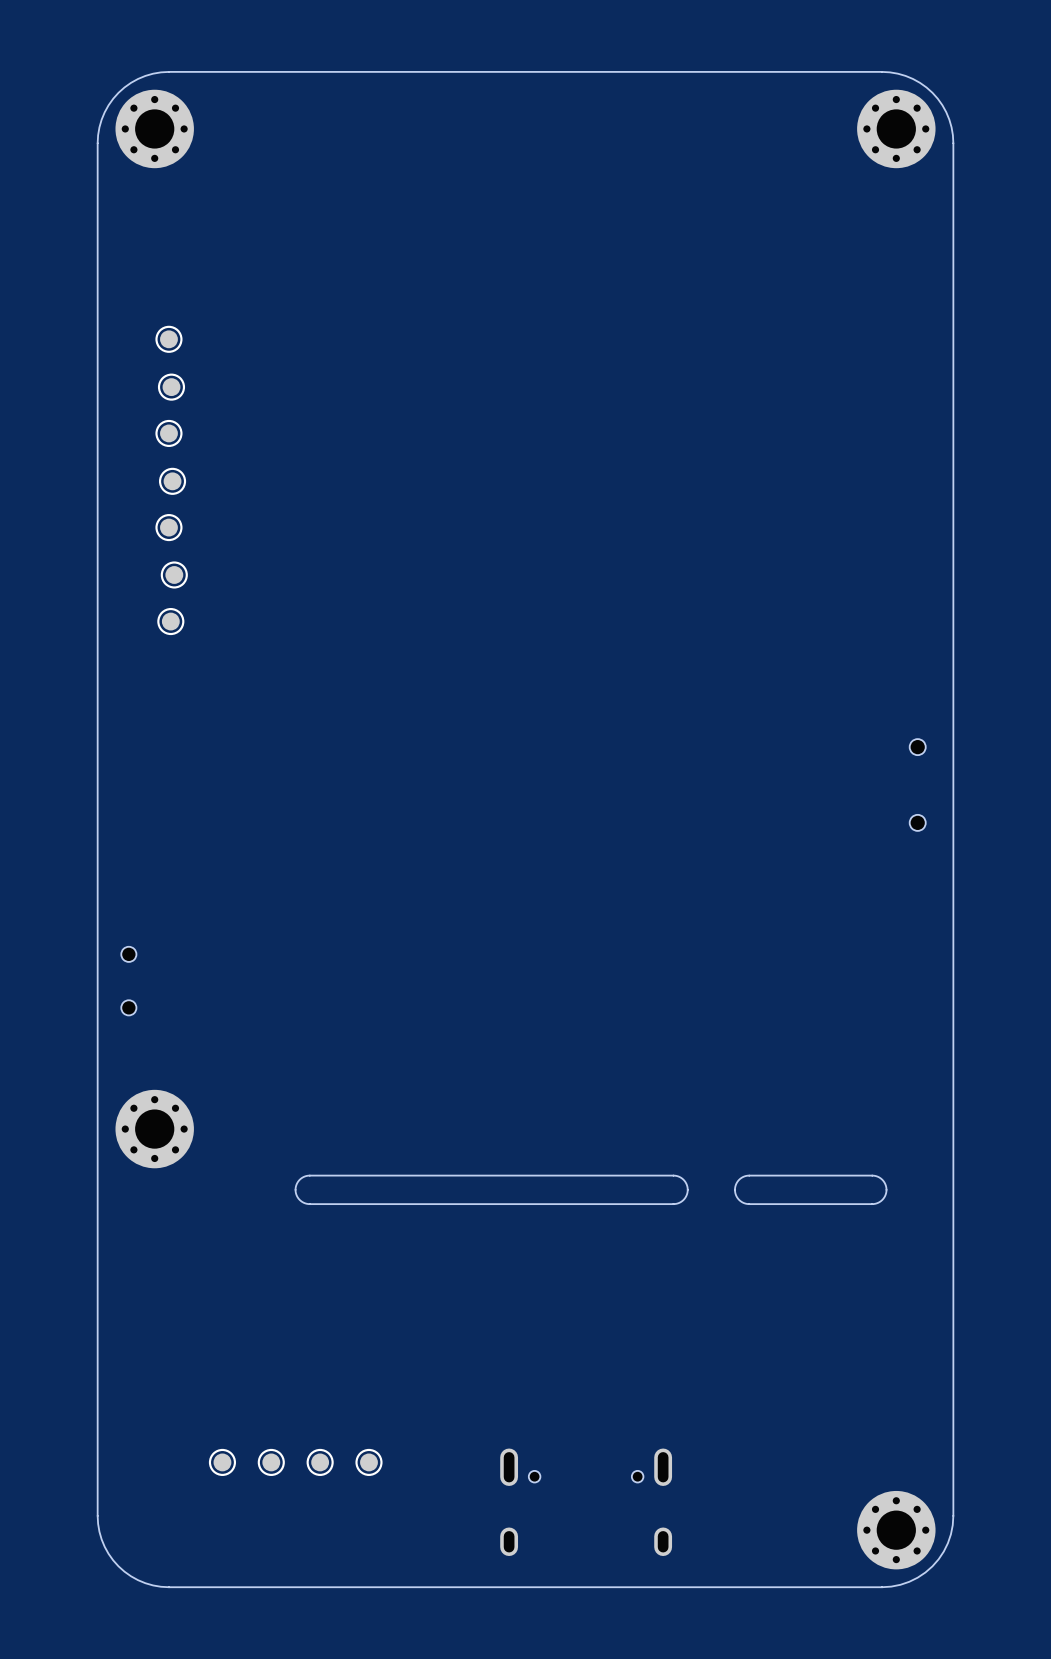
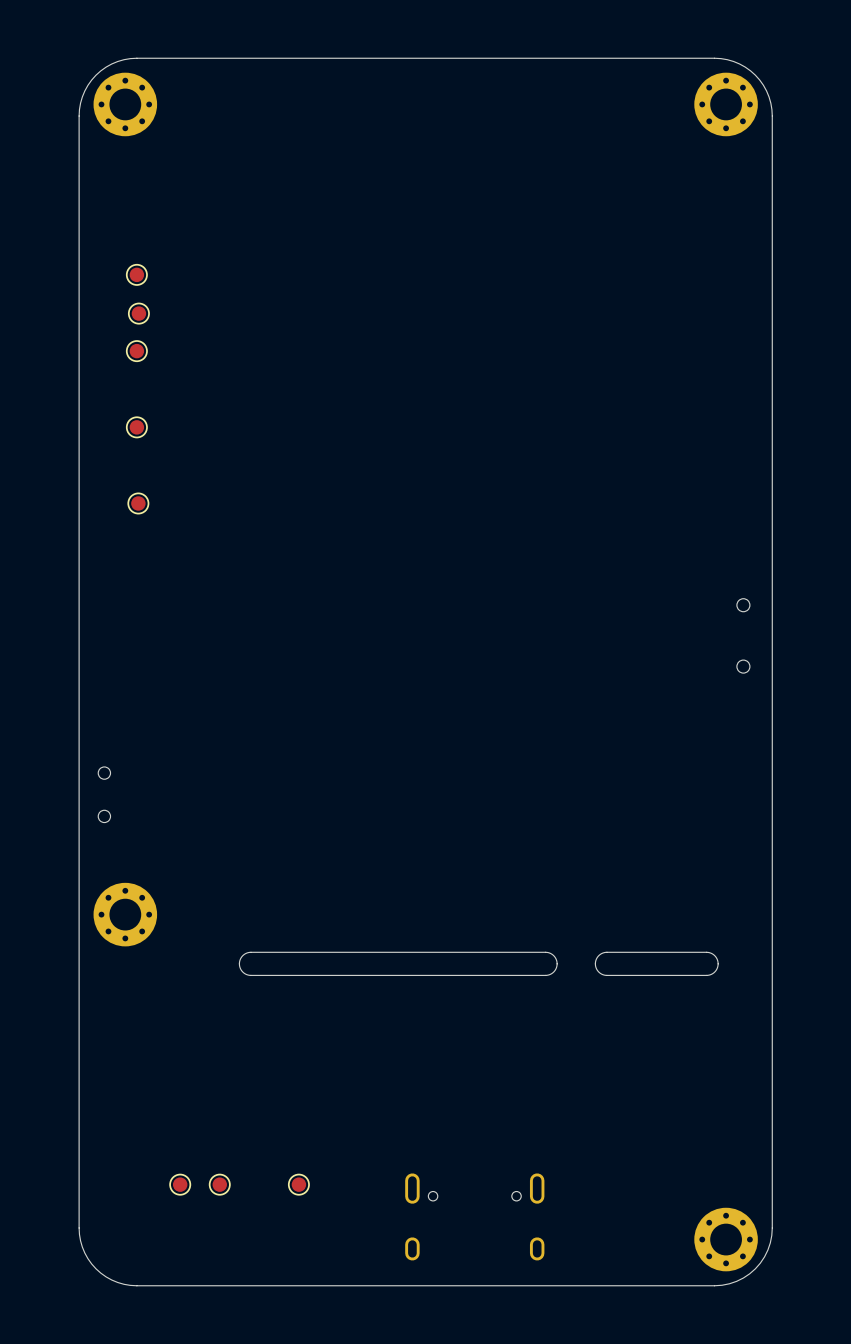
part: (172, 481) -> none
part: (174, 574) -> none
part: (320, 1462) -> none

